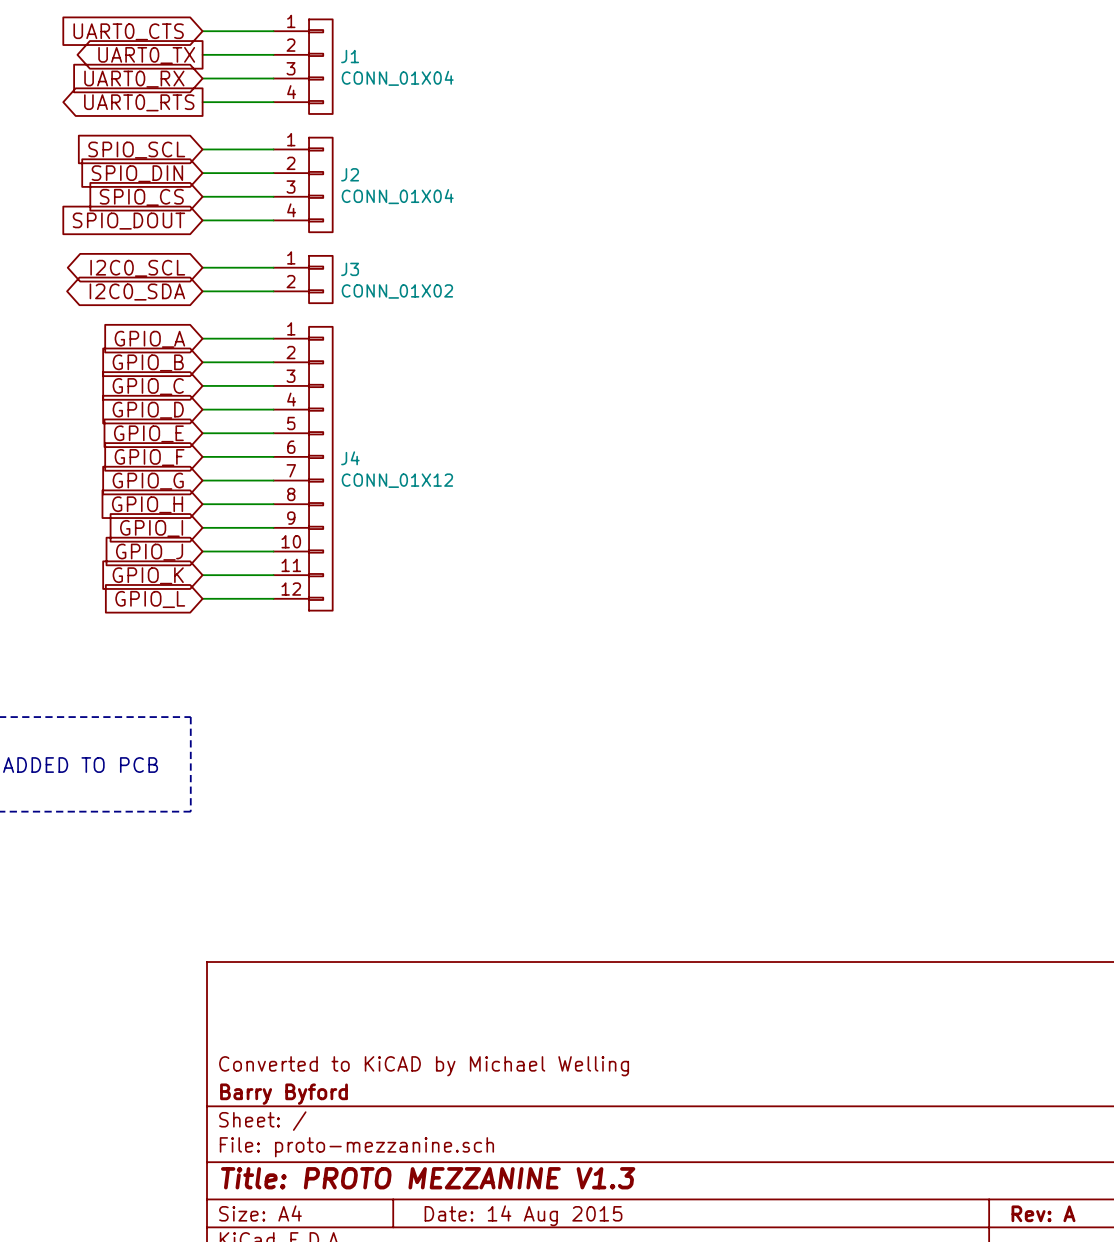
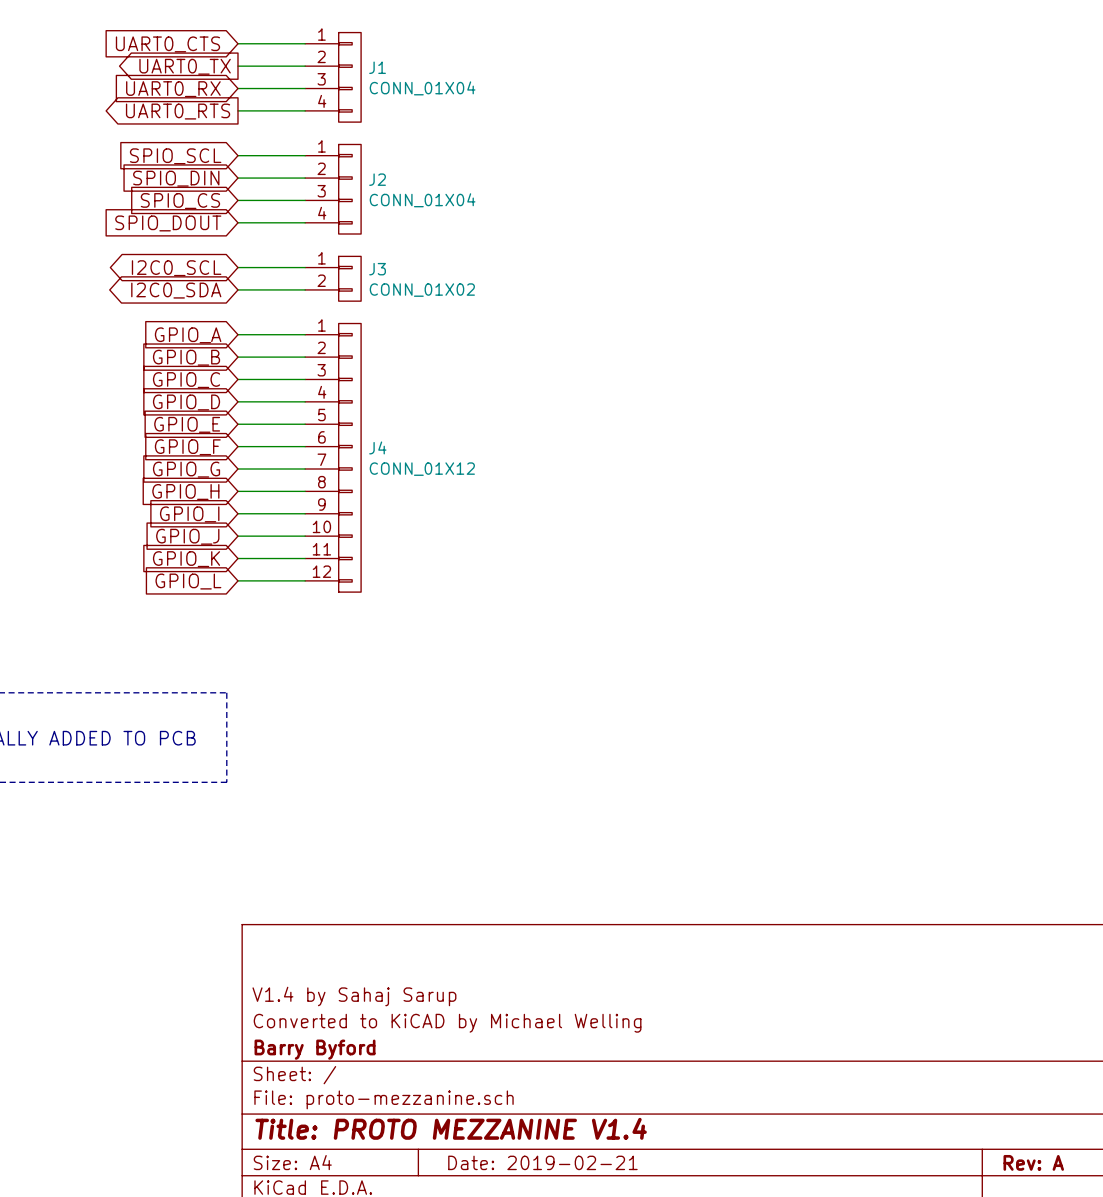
title block: none -> V1.4 by Sahaj Sarup (354, 996)
title block: Title: PROTO MEZZANINE V1.3 (428, 1178) -> Title: PROTO MEZZANINE V1.4 (451, 1128)
title block: Date: 14 Aug 2015 (523, 1215) -> Date: 2019-02-21 (542, 1162)

